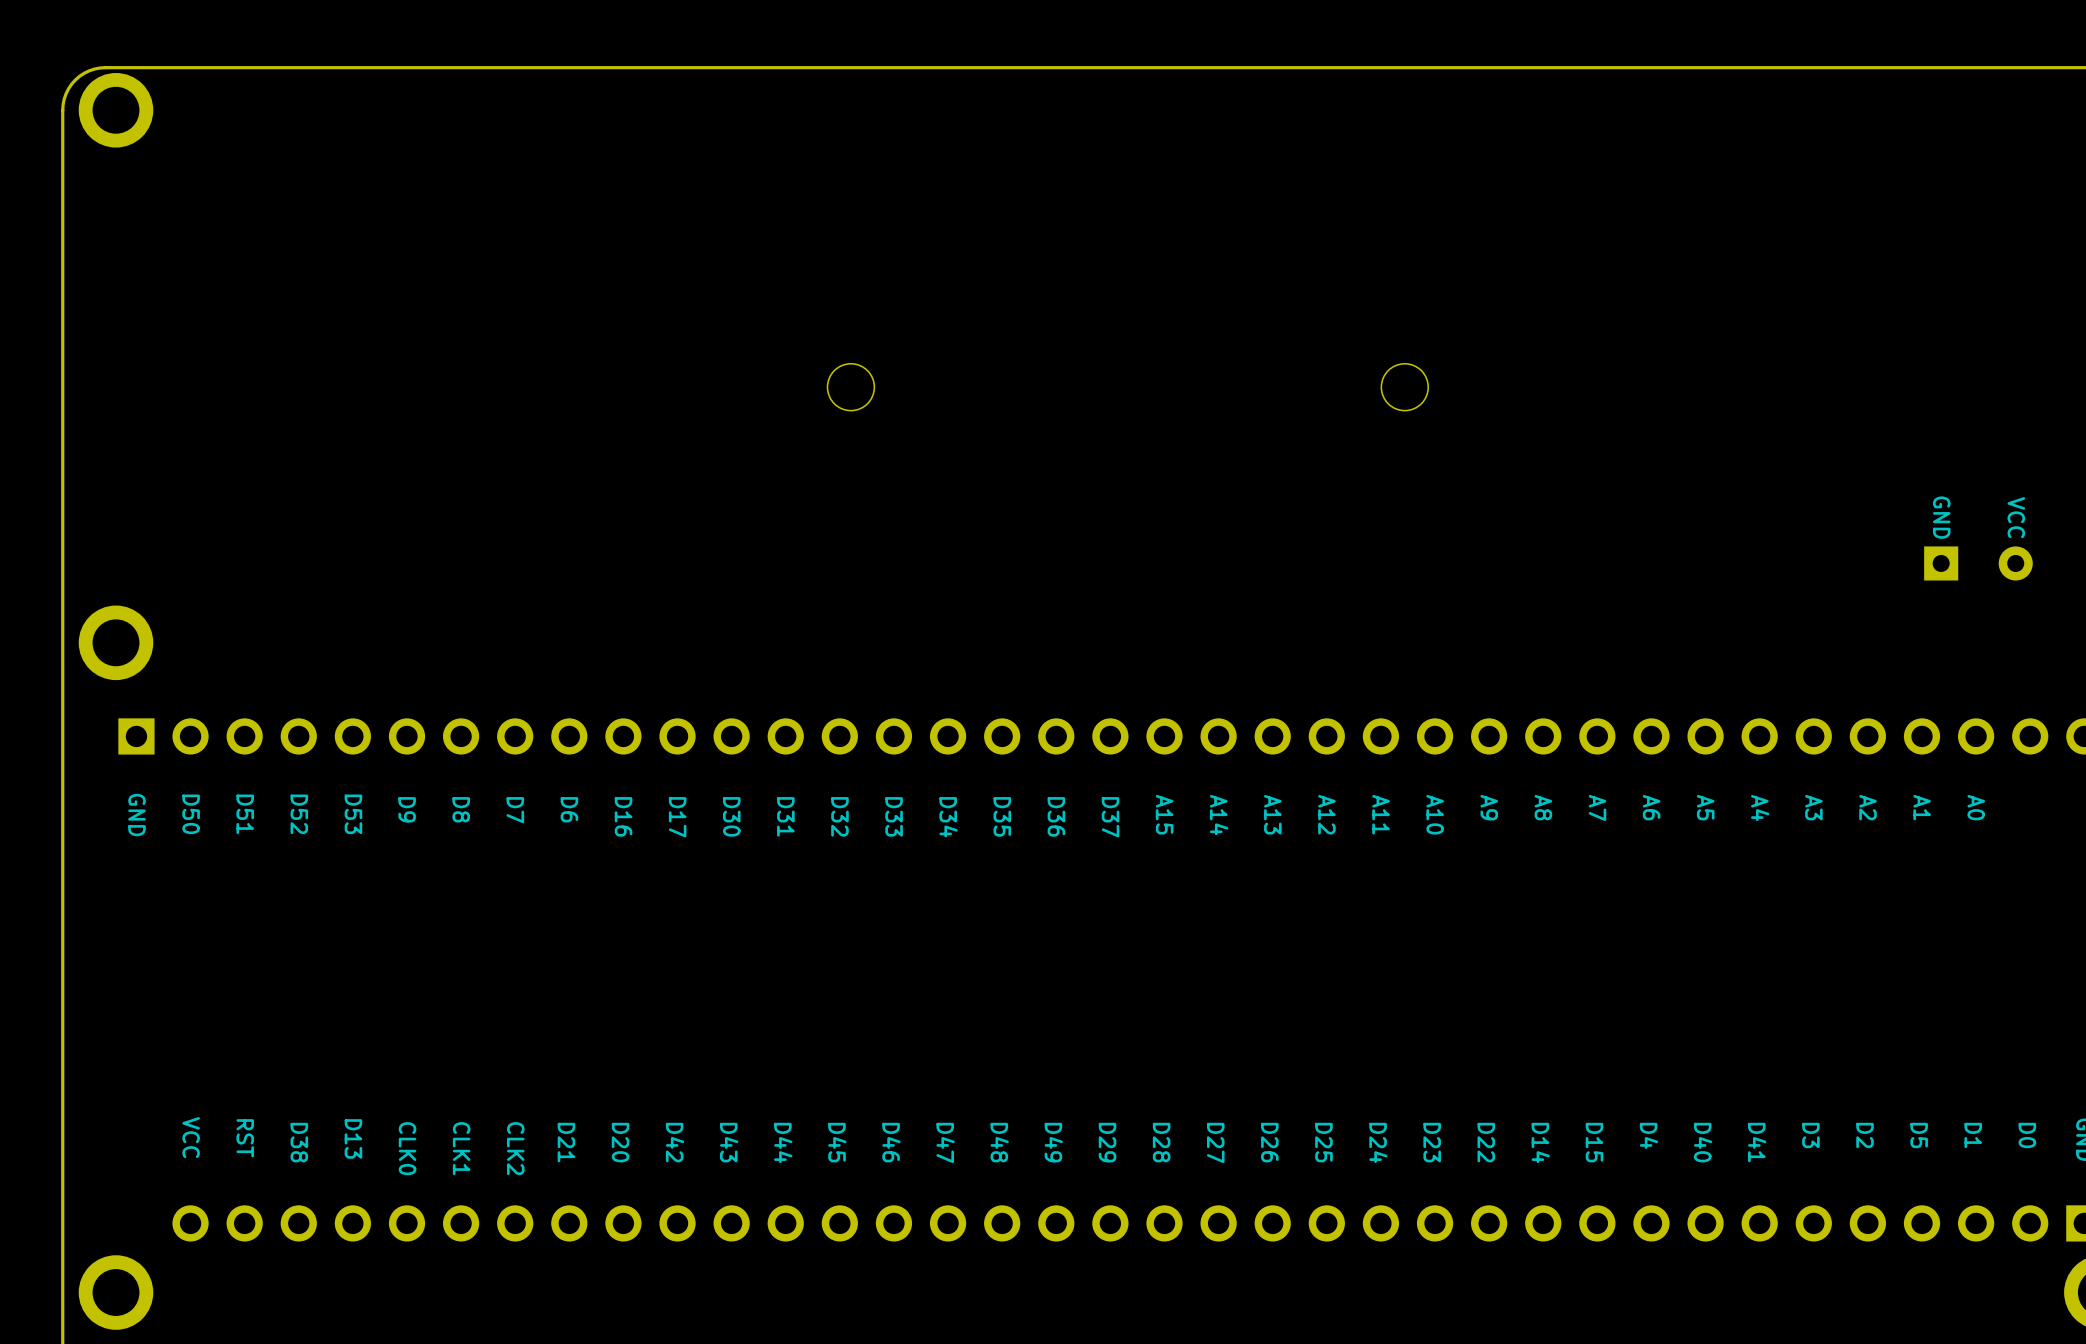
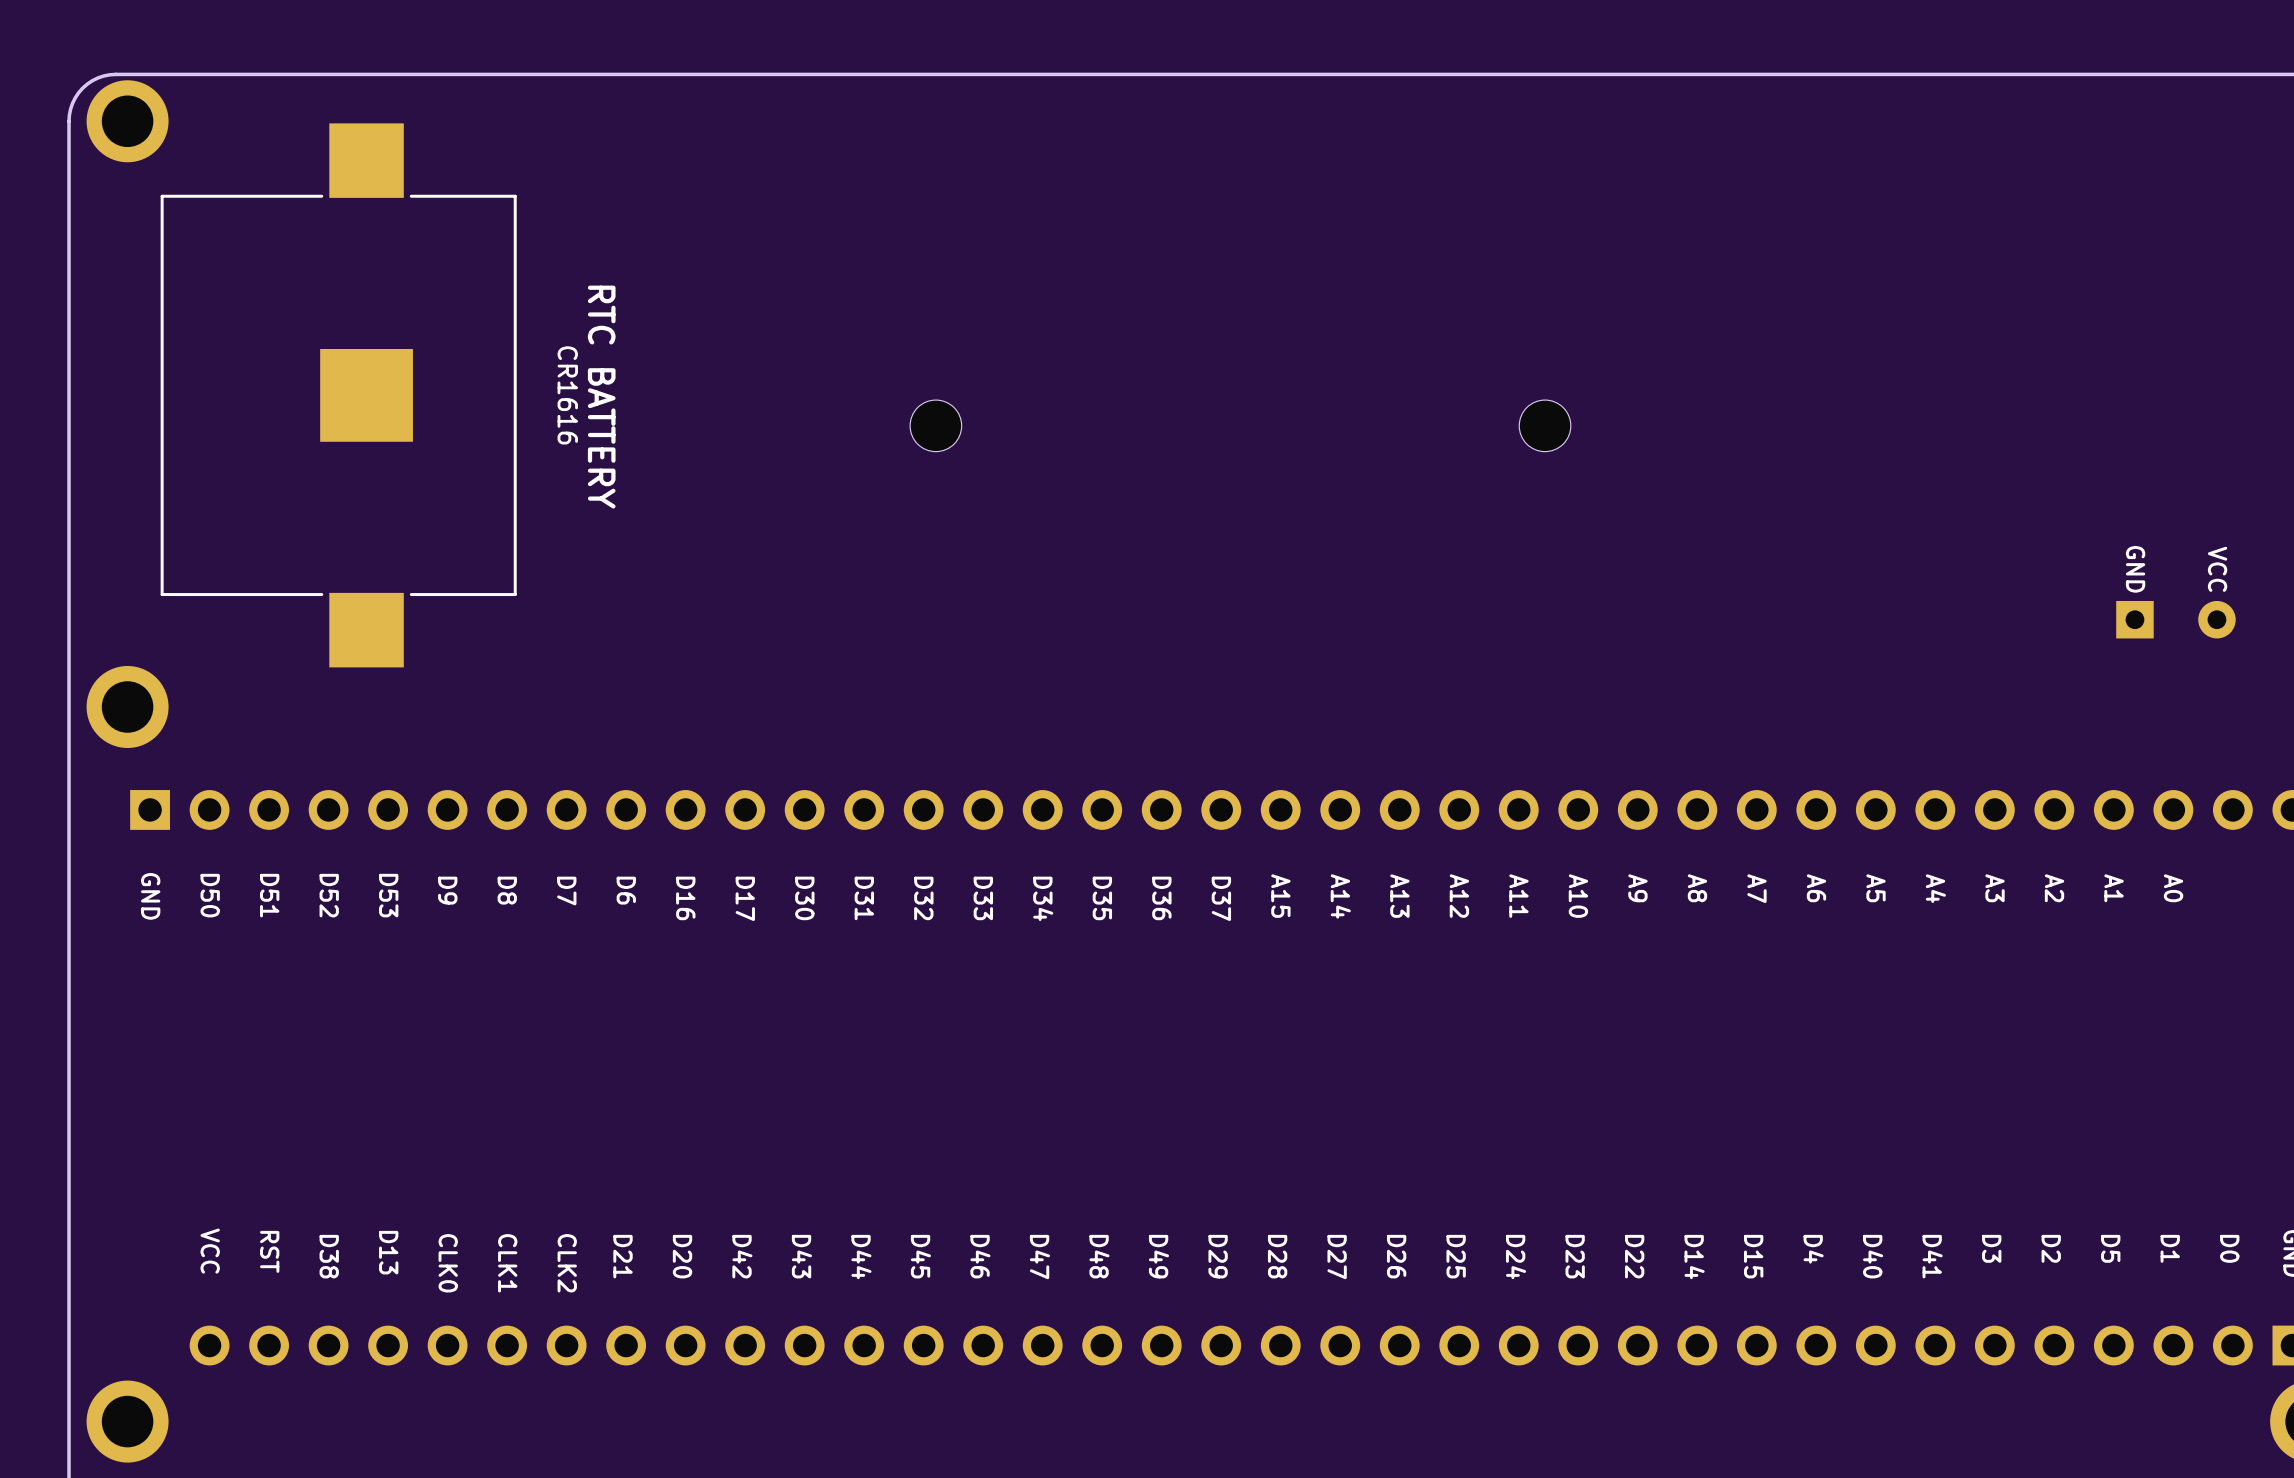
part: none -> CR1616 (338, 395)
text: none -> RTC BATTERY (601, 397)

